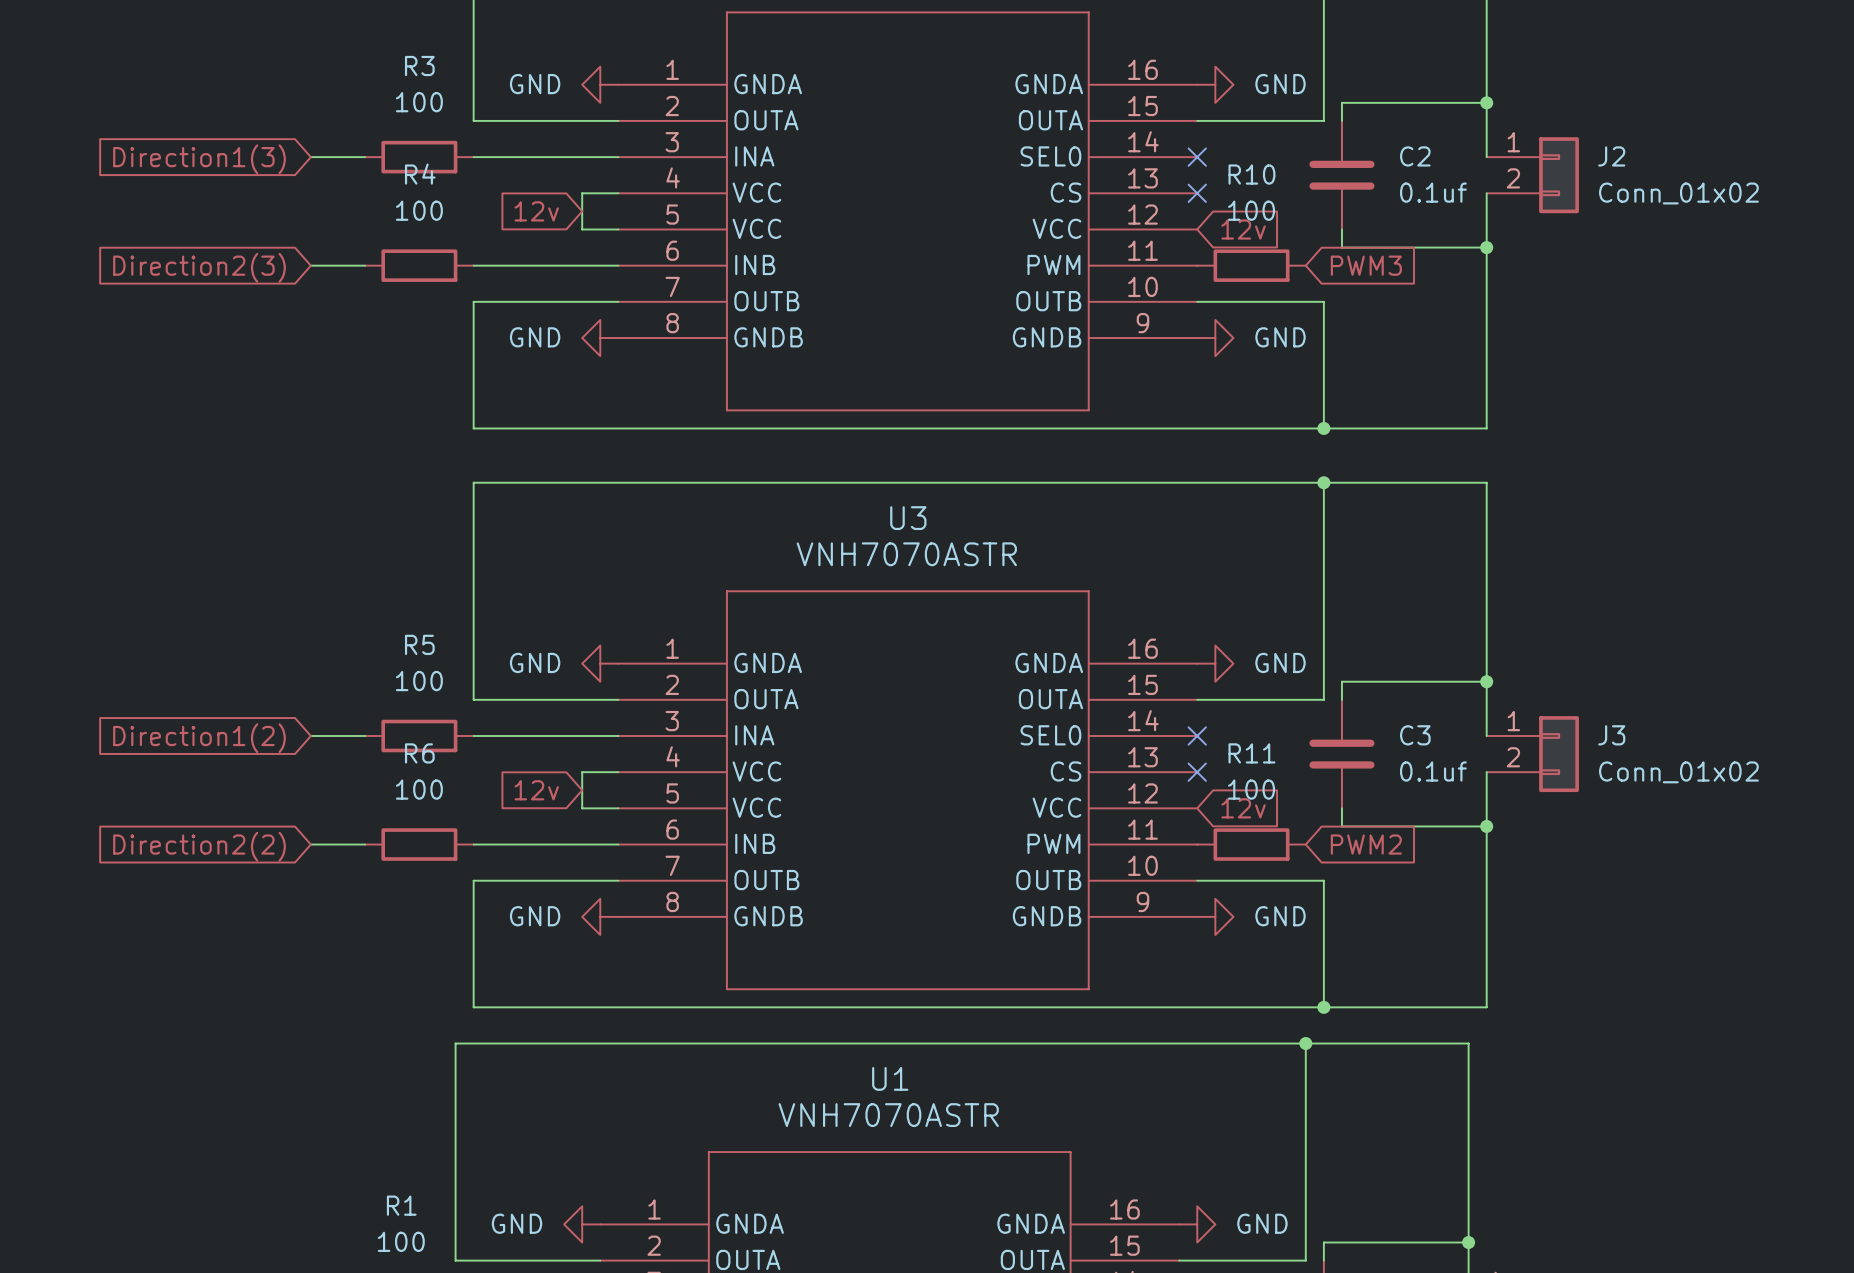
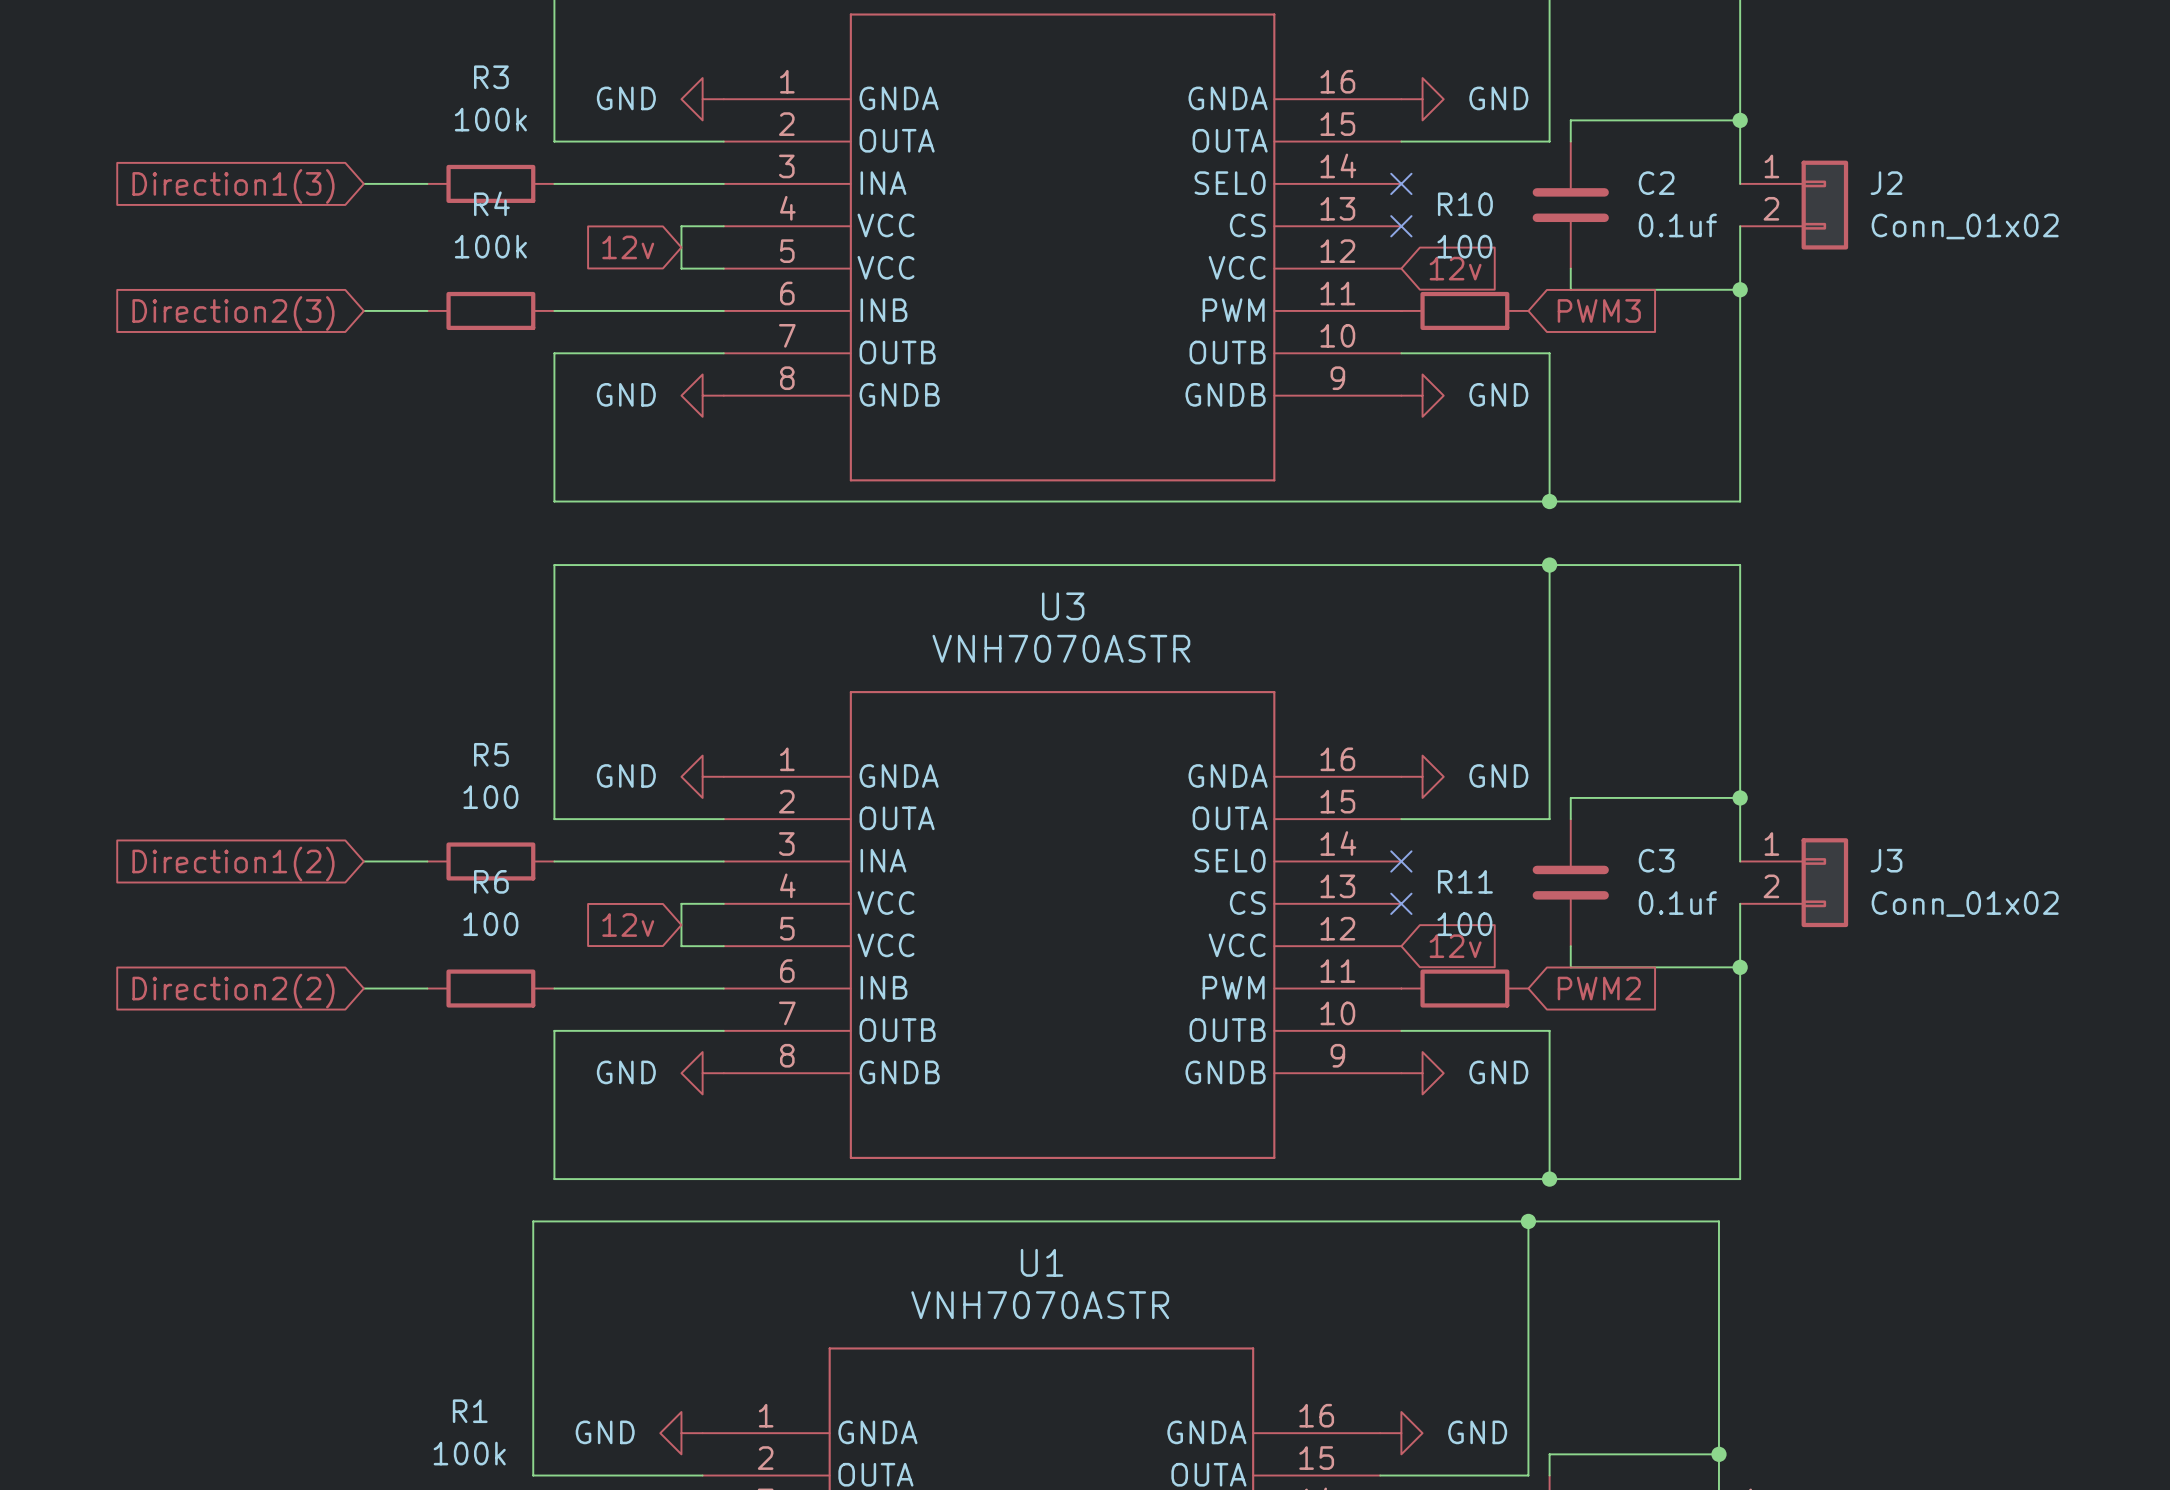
R3 value: 100 (419, 102) -> 100k (490, 119)
R4 value: 100 (419, 210) -> 100k (490, 246)
R1 value: 100 (401, 1241) -> 100k (469, 1453)

